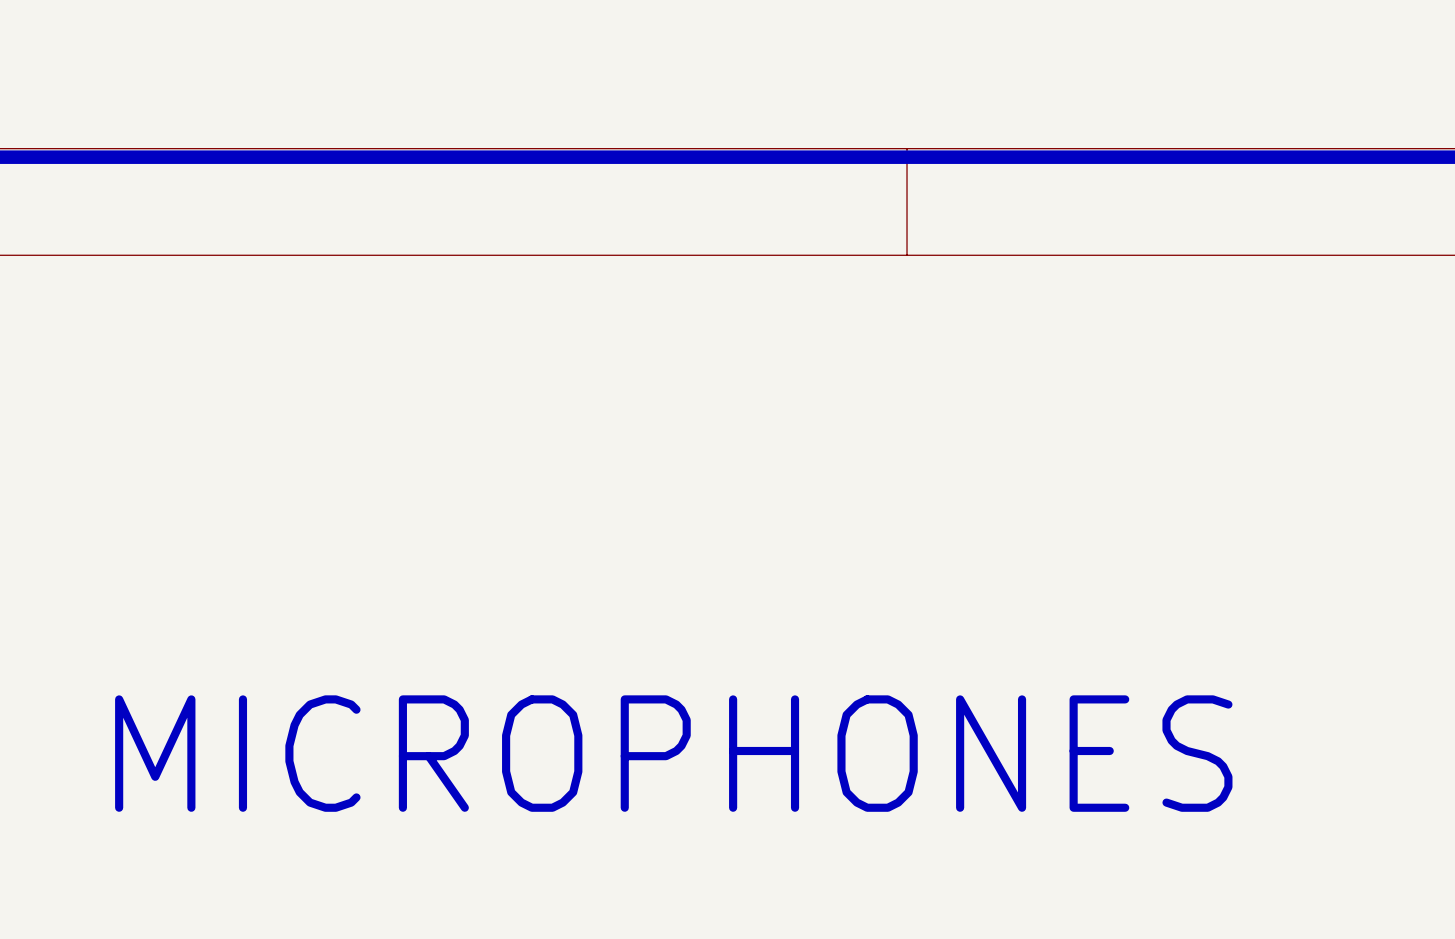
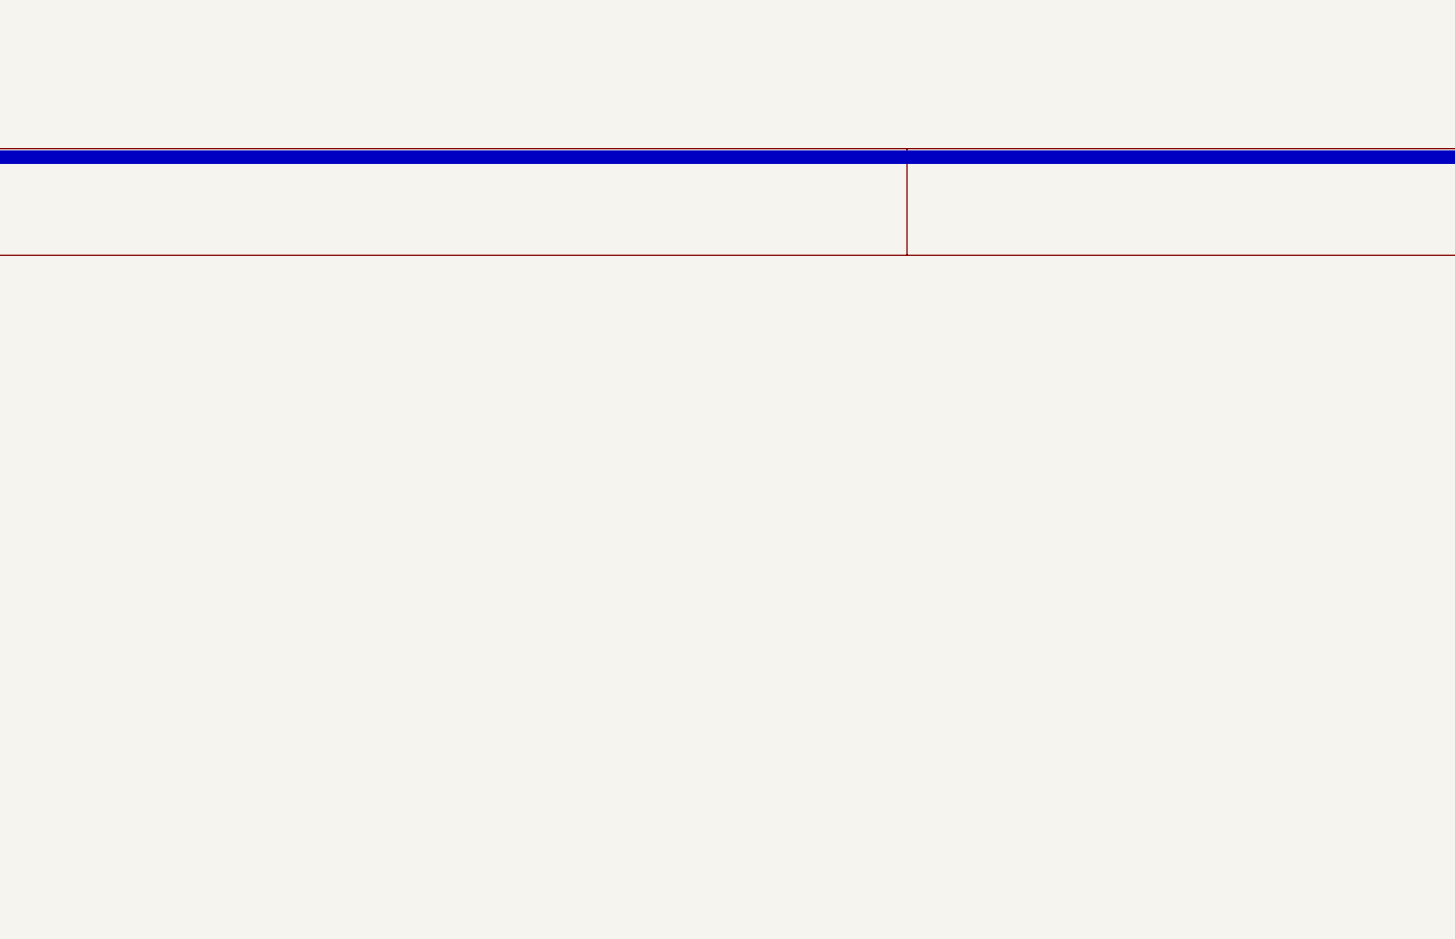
text: MICROPHONES (673, 753) -> none

